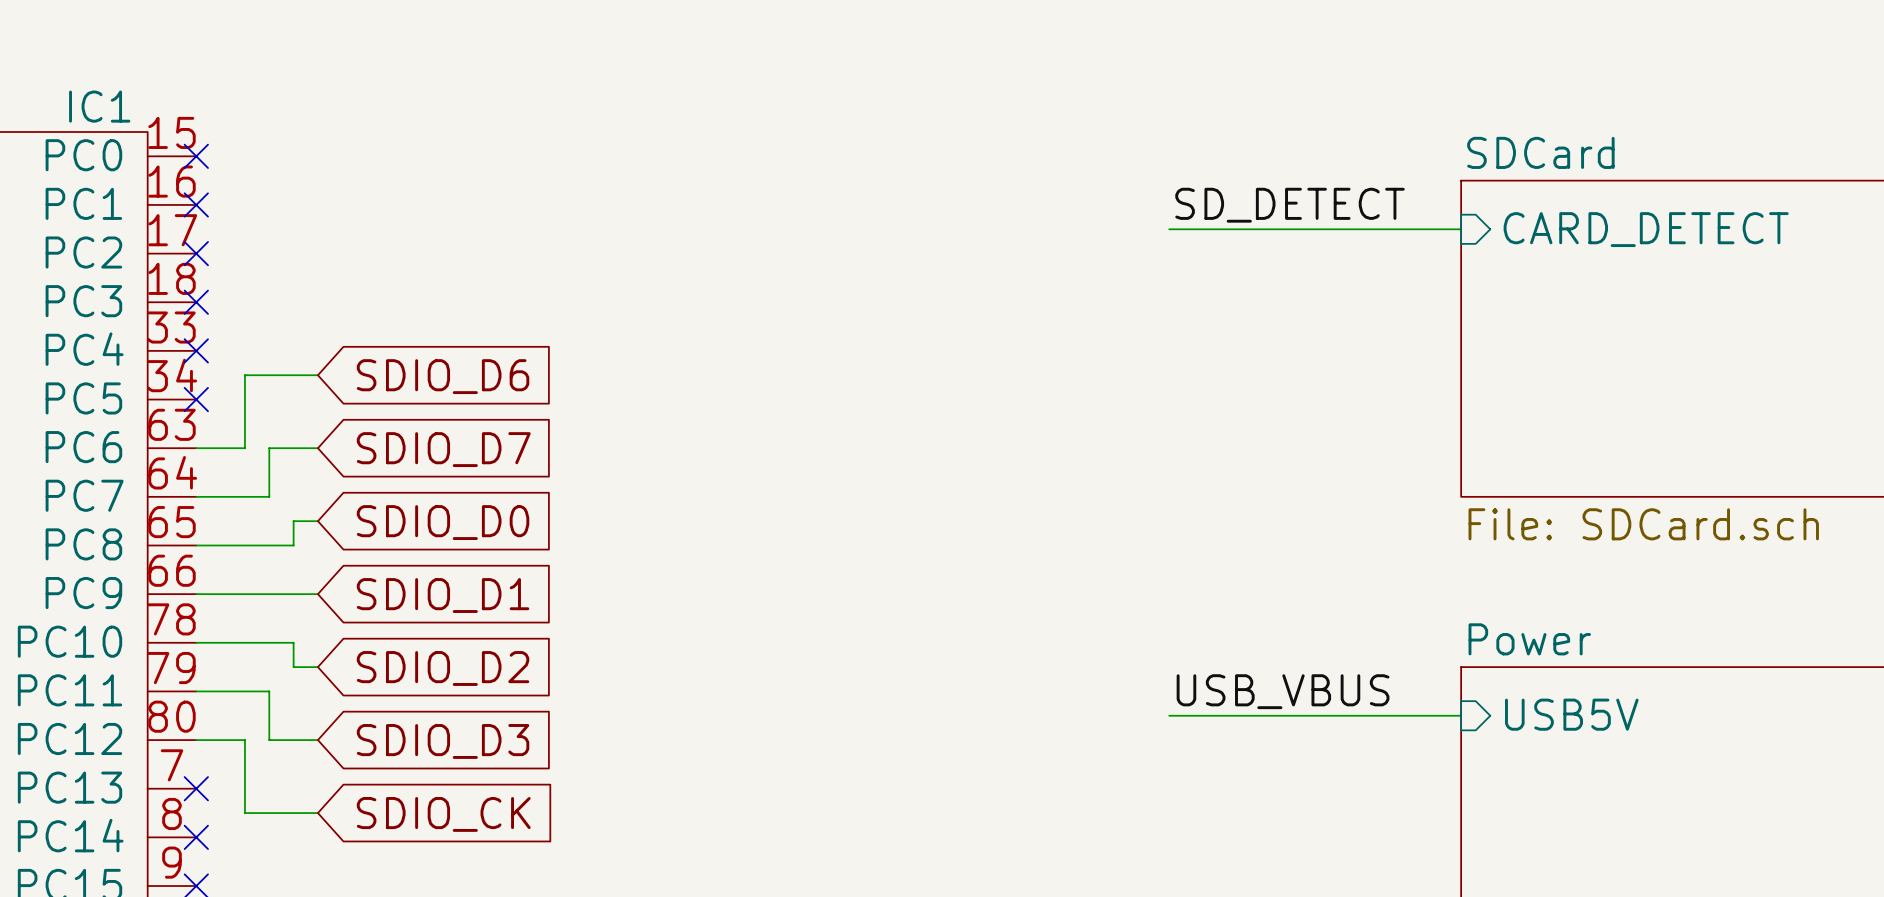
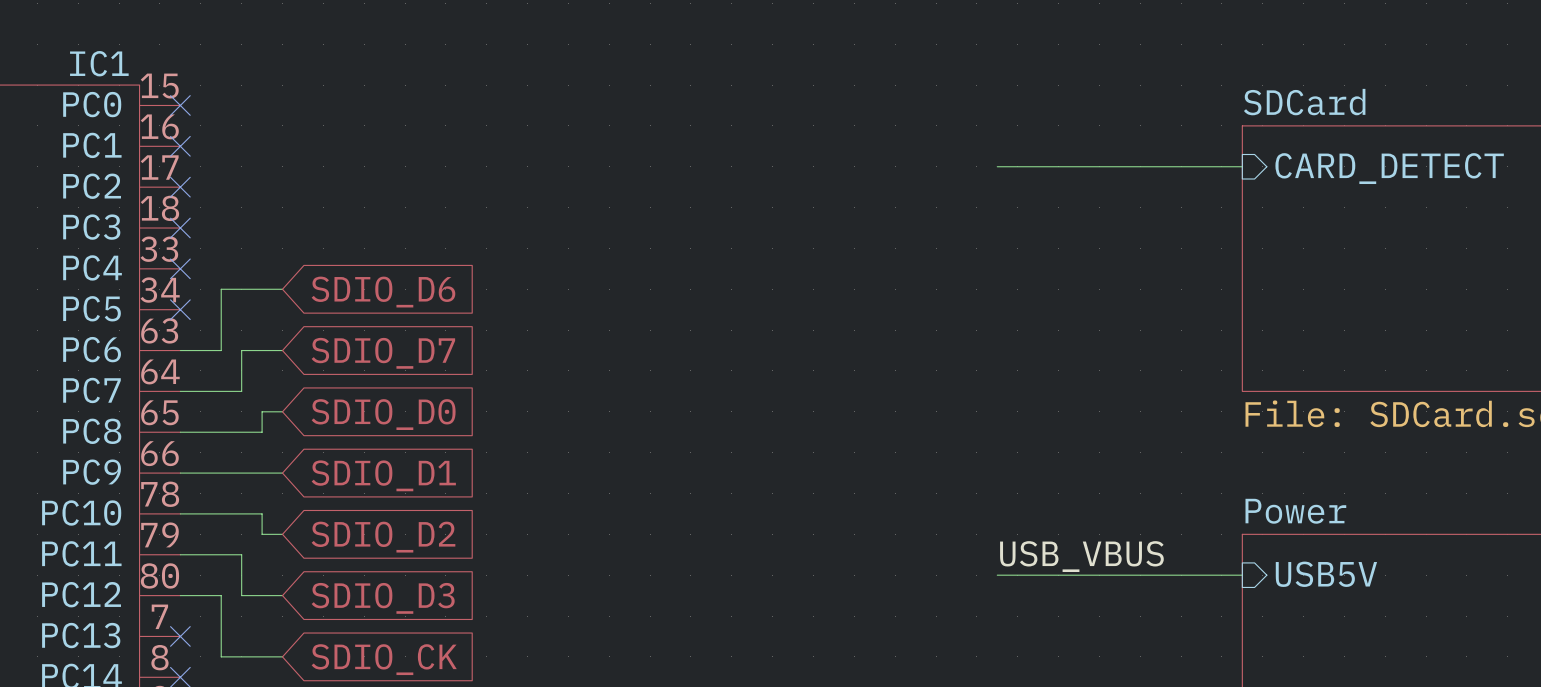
label: SD_DETECT (1290, 205) -> none

